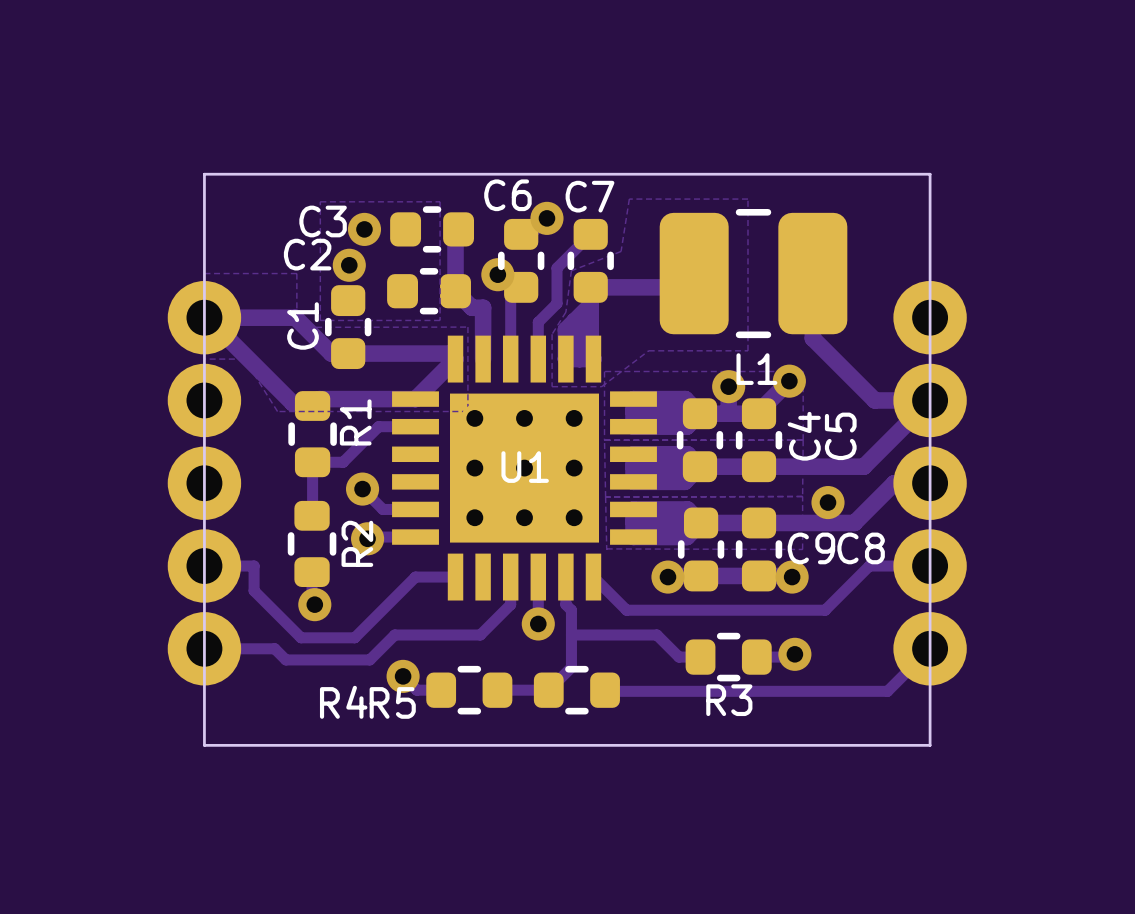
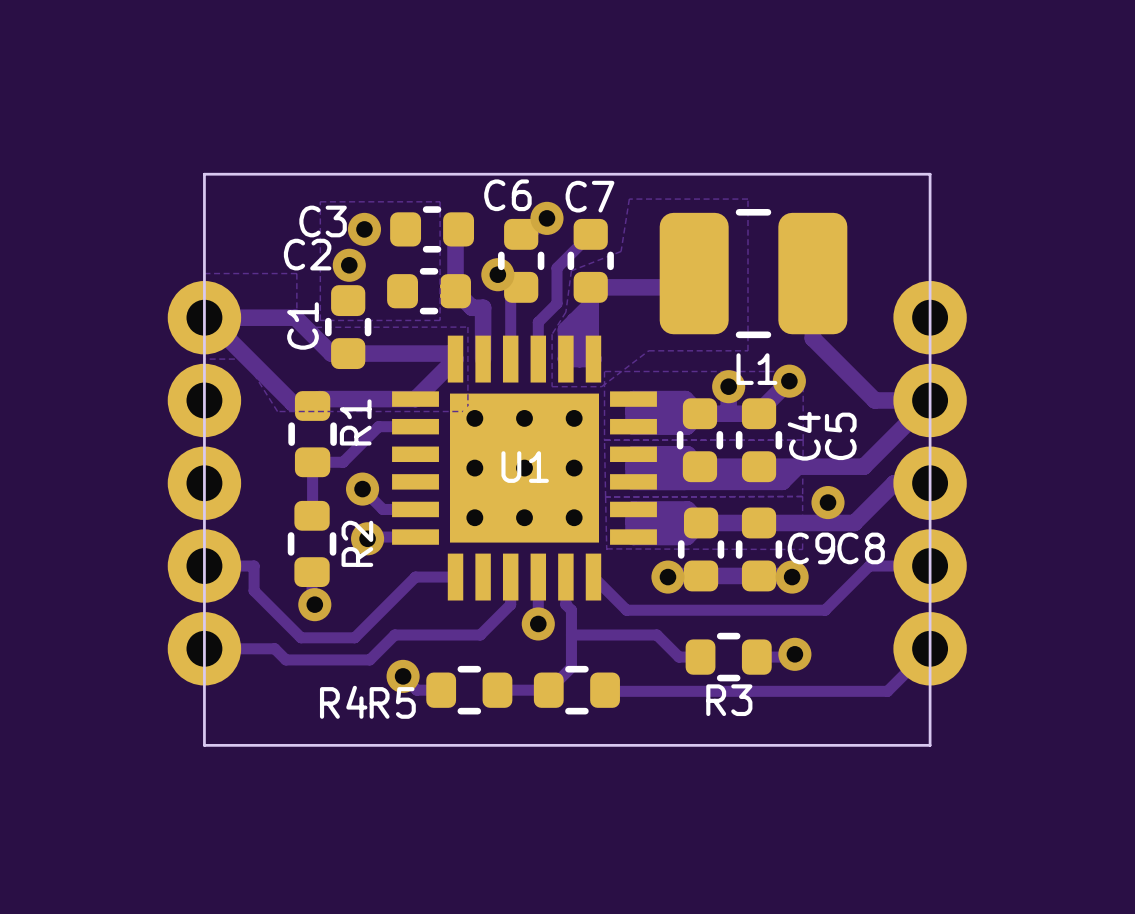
track: none -> (797, 466) (782, 481) (684, 481)

